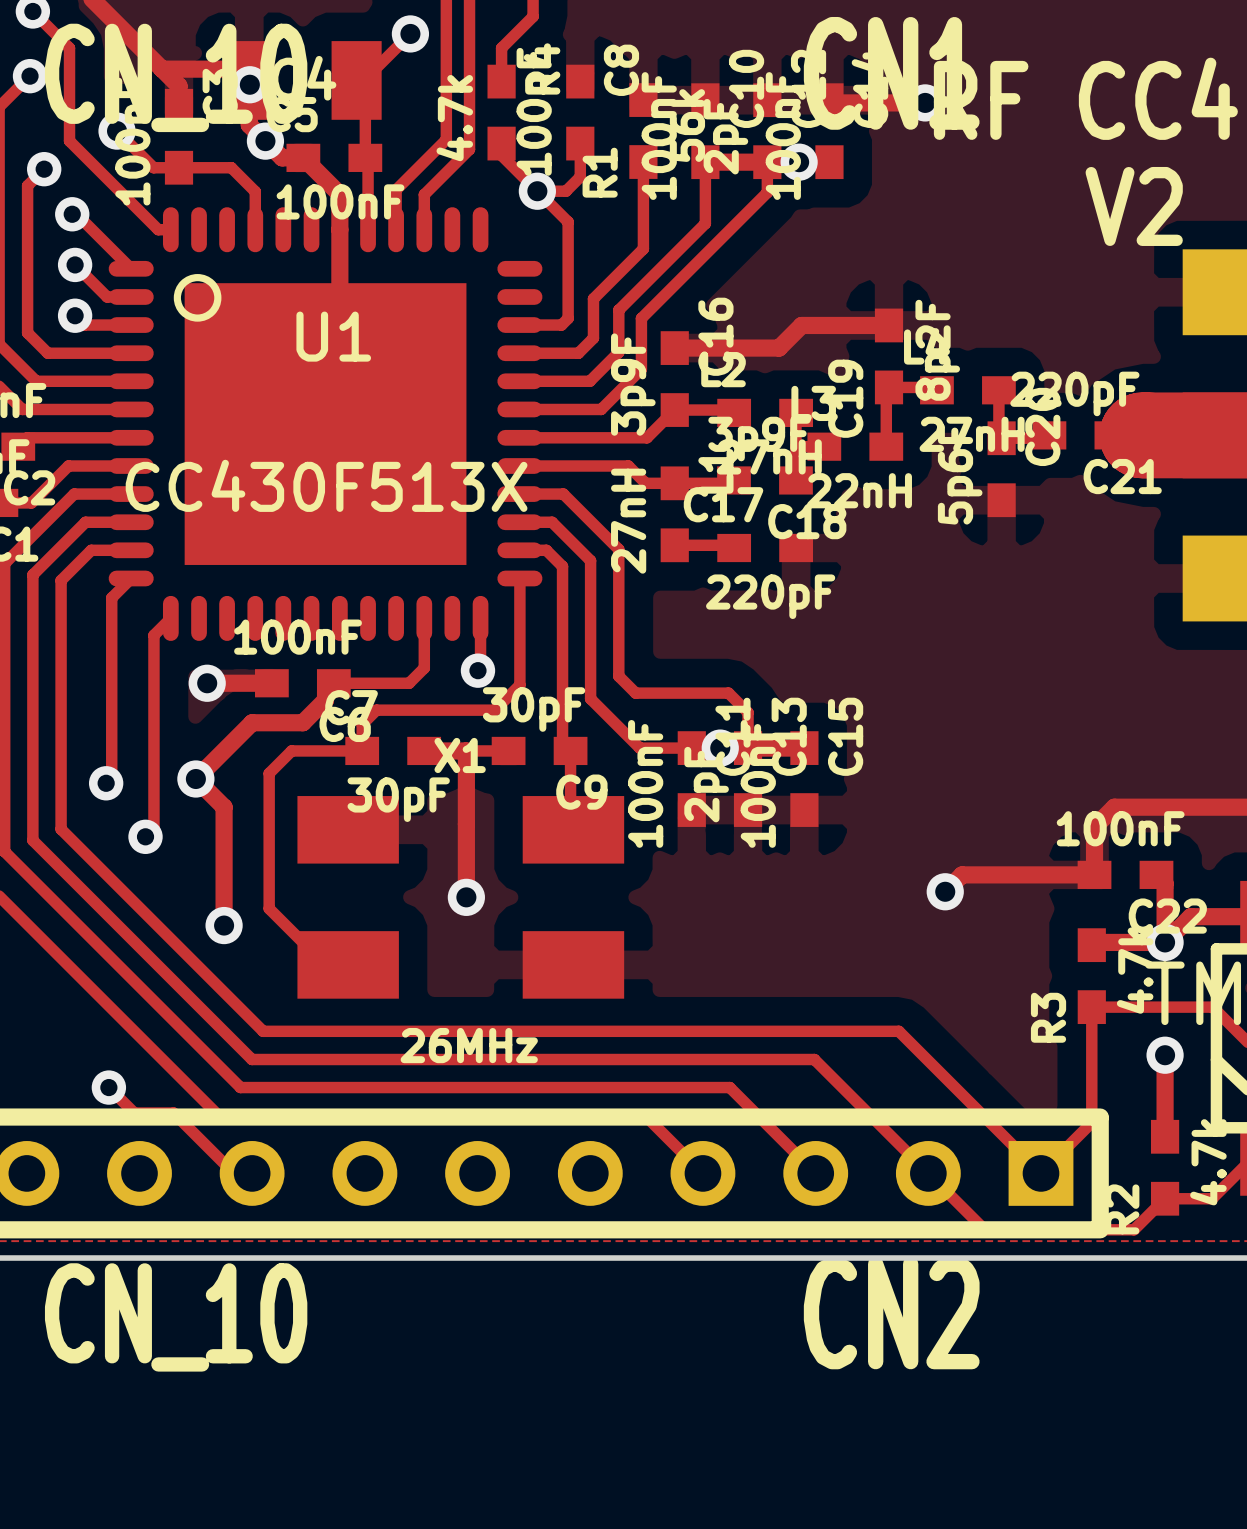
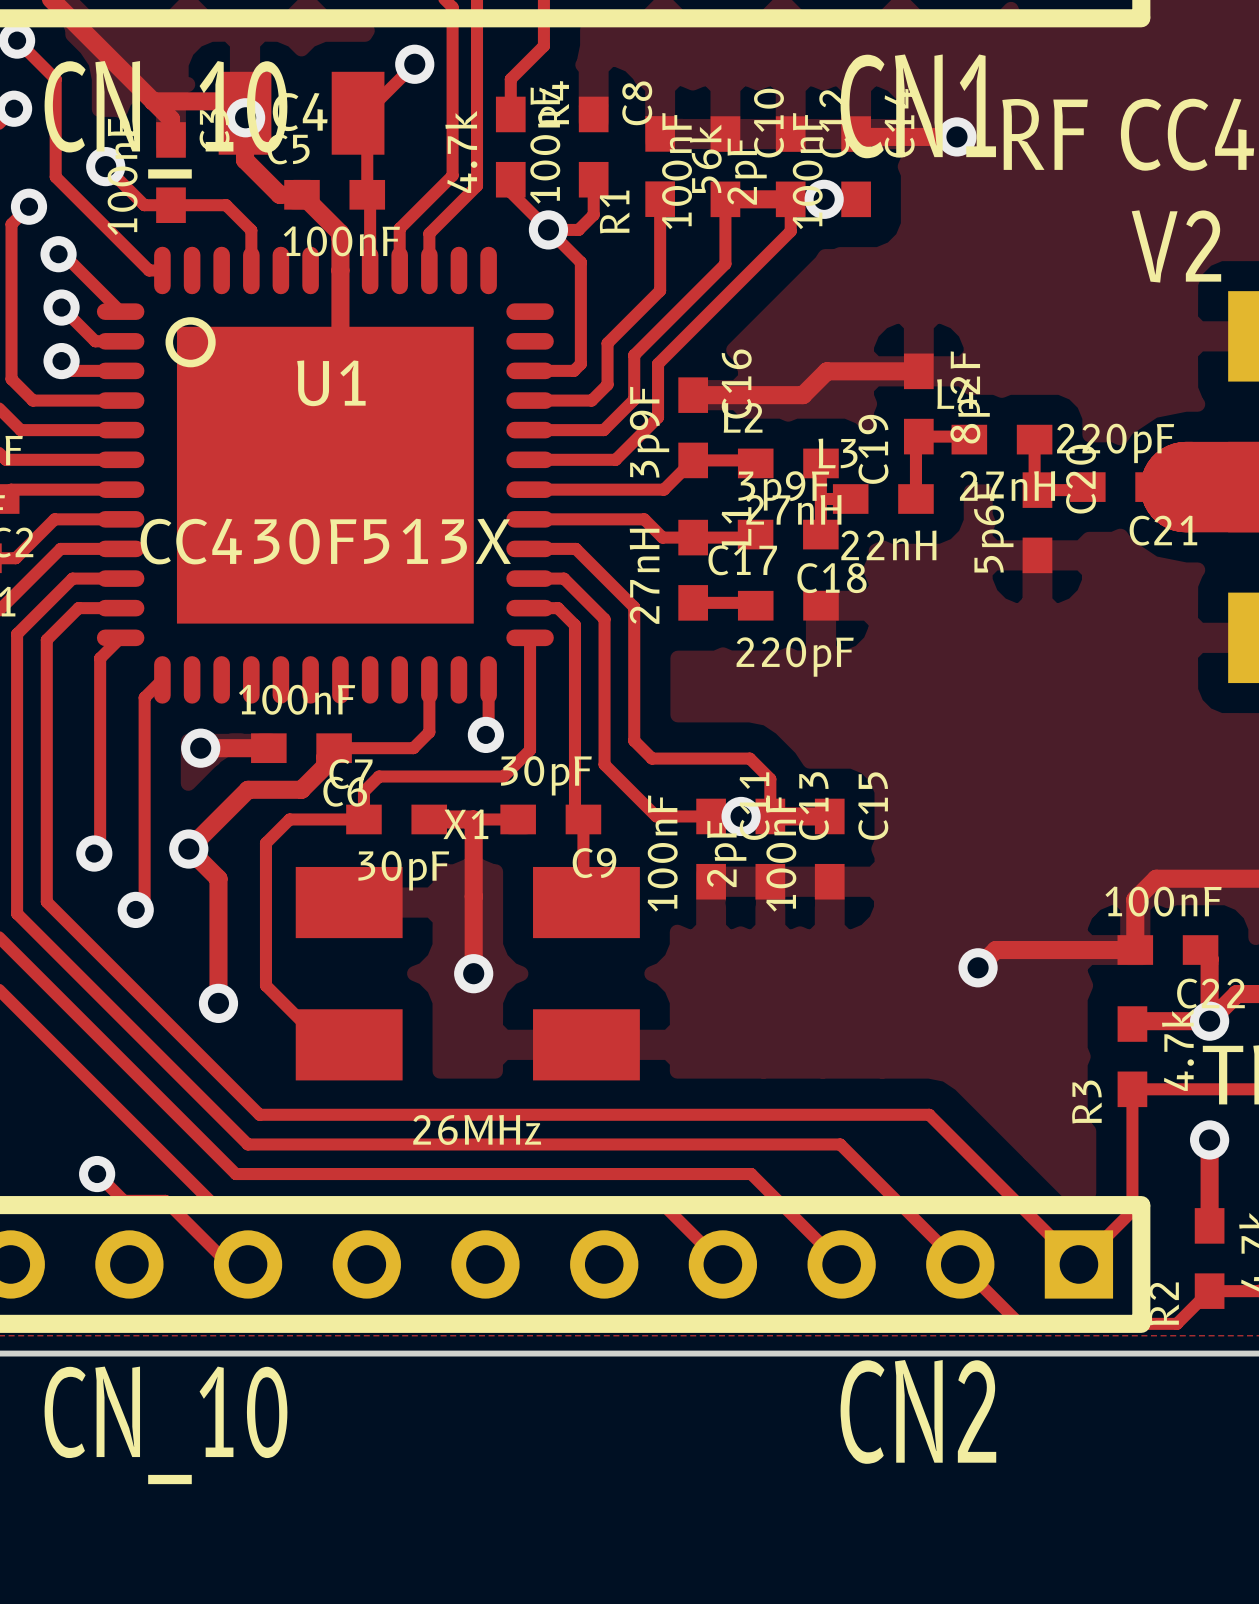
via: (265, 141) -> none

